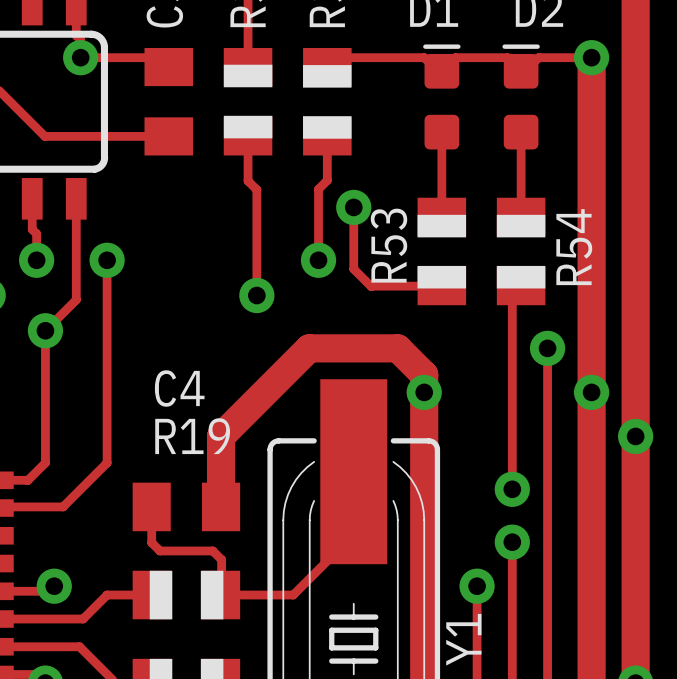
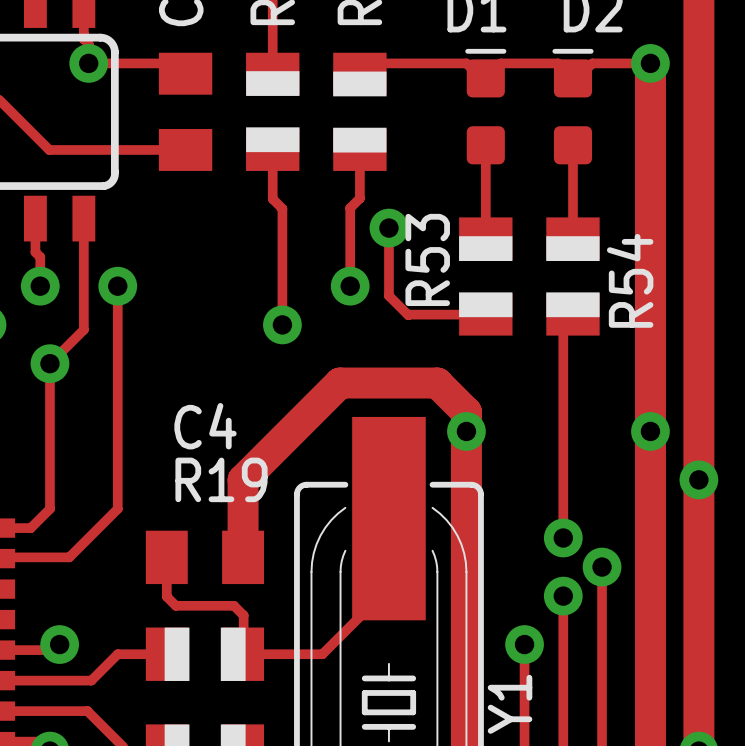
track: (547, 348) (547, 515) -> none
via position: (547, 348) -> (602, 567)

